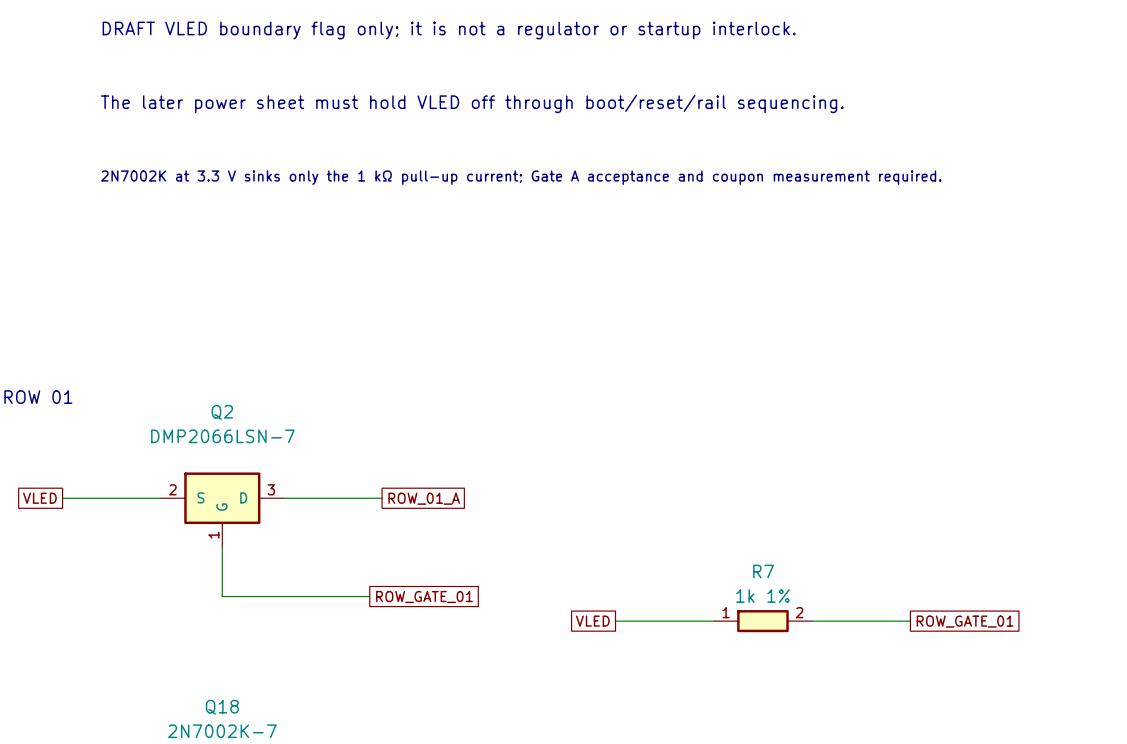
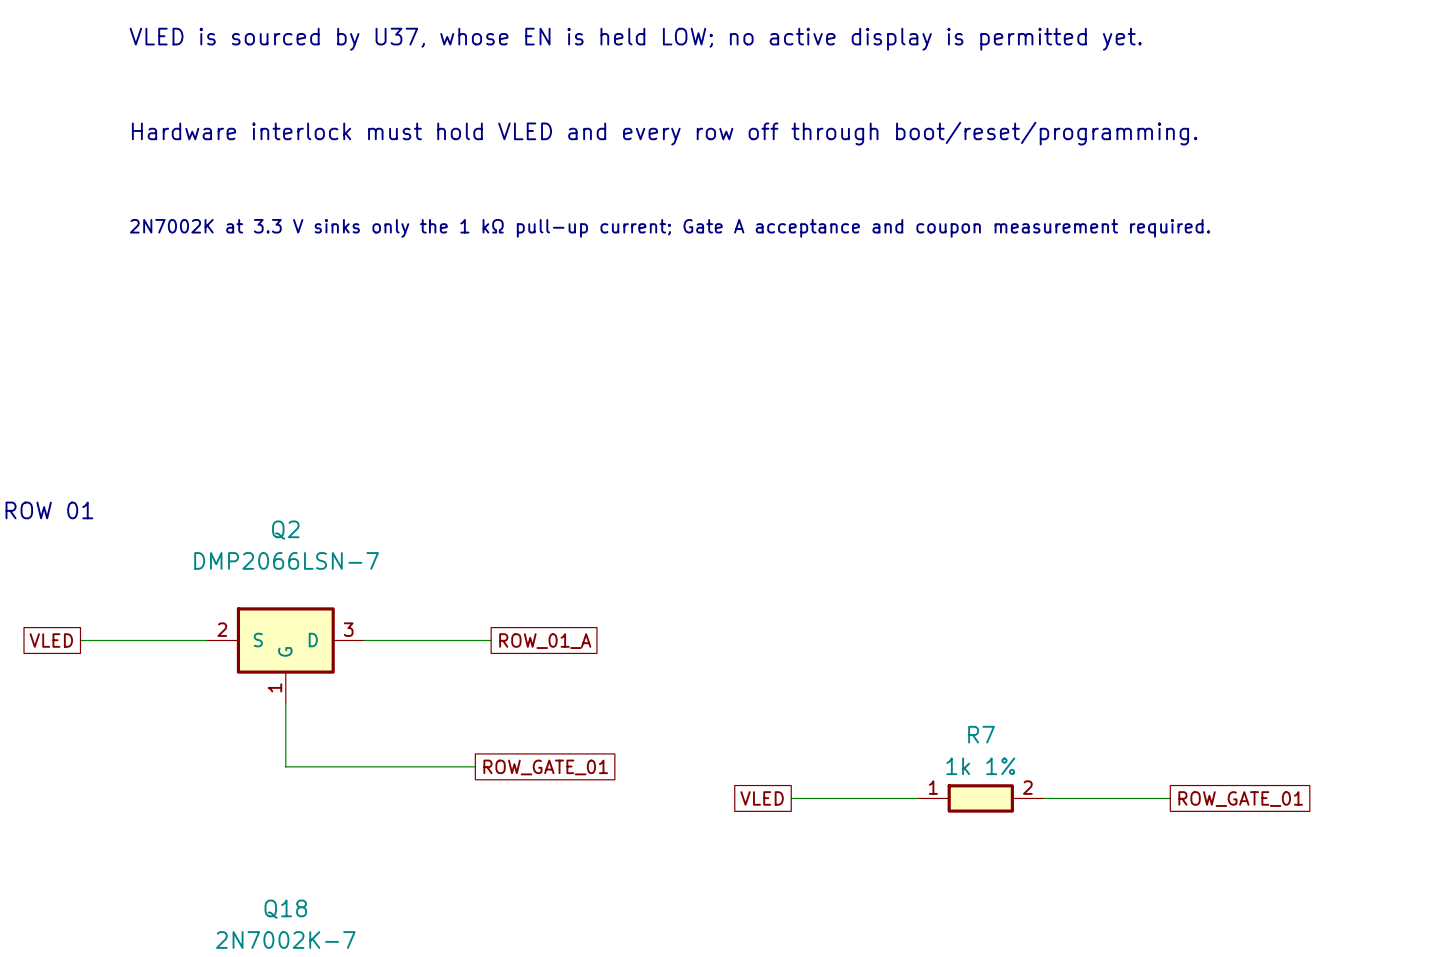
text: DRAFT VLED boundary flag only; it is not a regulator or startup interlock. (449, 30) -> VLED is sourced by U37, whose EN is held LOW; no active display is permitted yet. (635, 39)
text: The later power sheet must hold VLED off through boot/reset/rail sequencing. (472, 103) -> Hardware interlock must hold VLED and every row off through boot/reset/programming. (664, 133)

